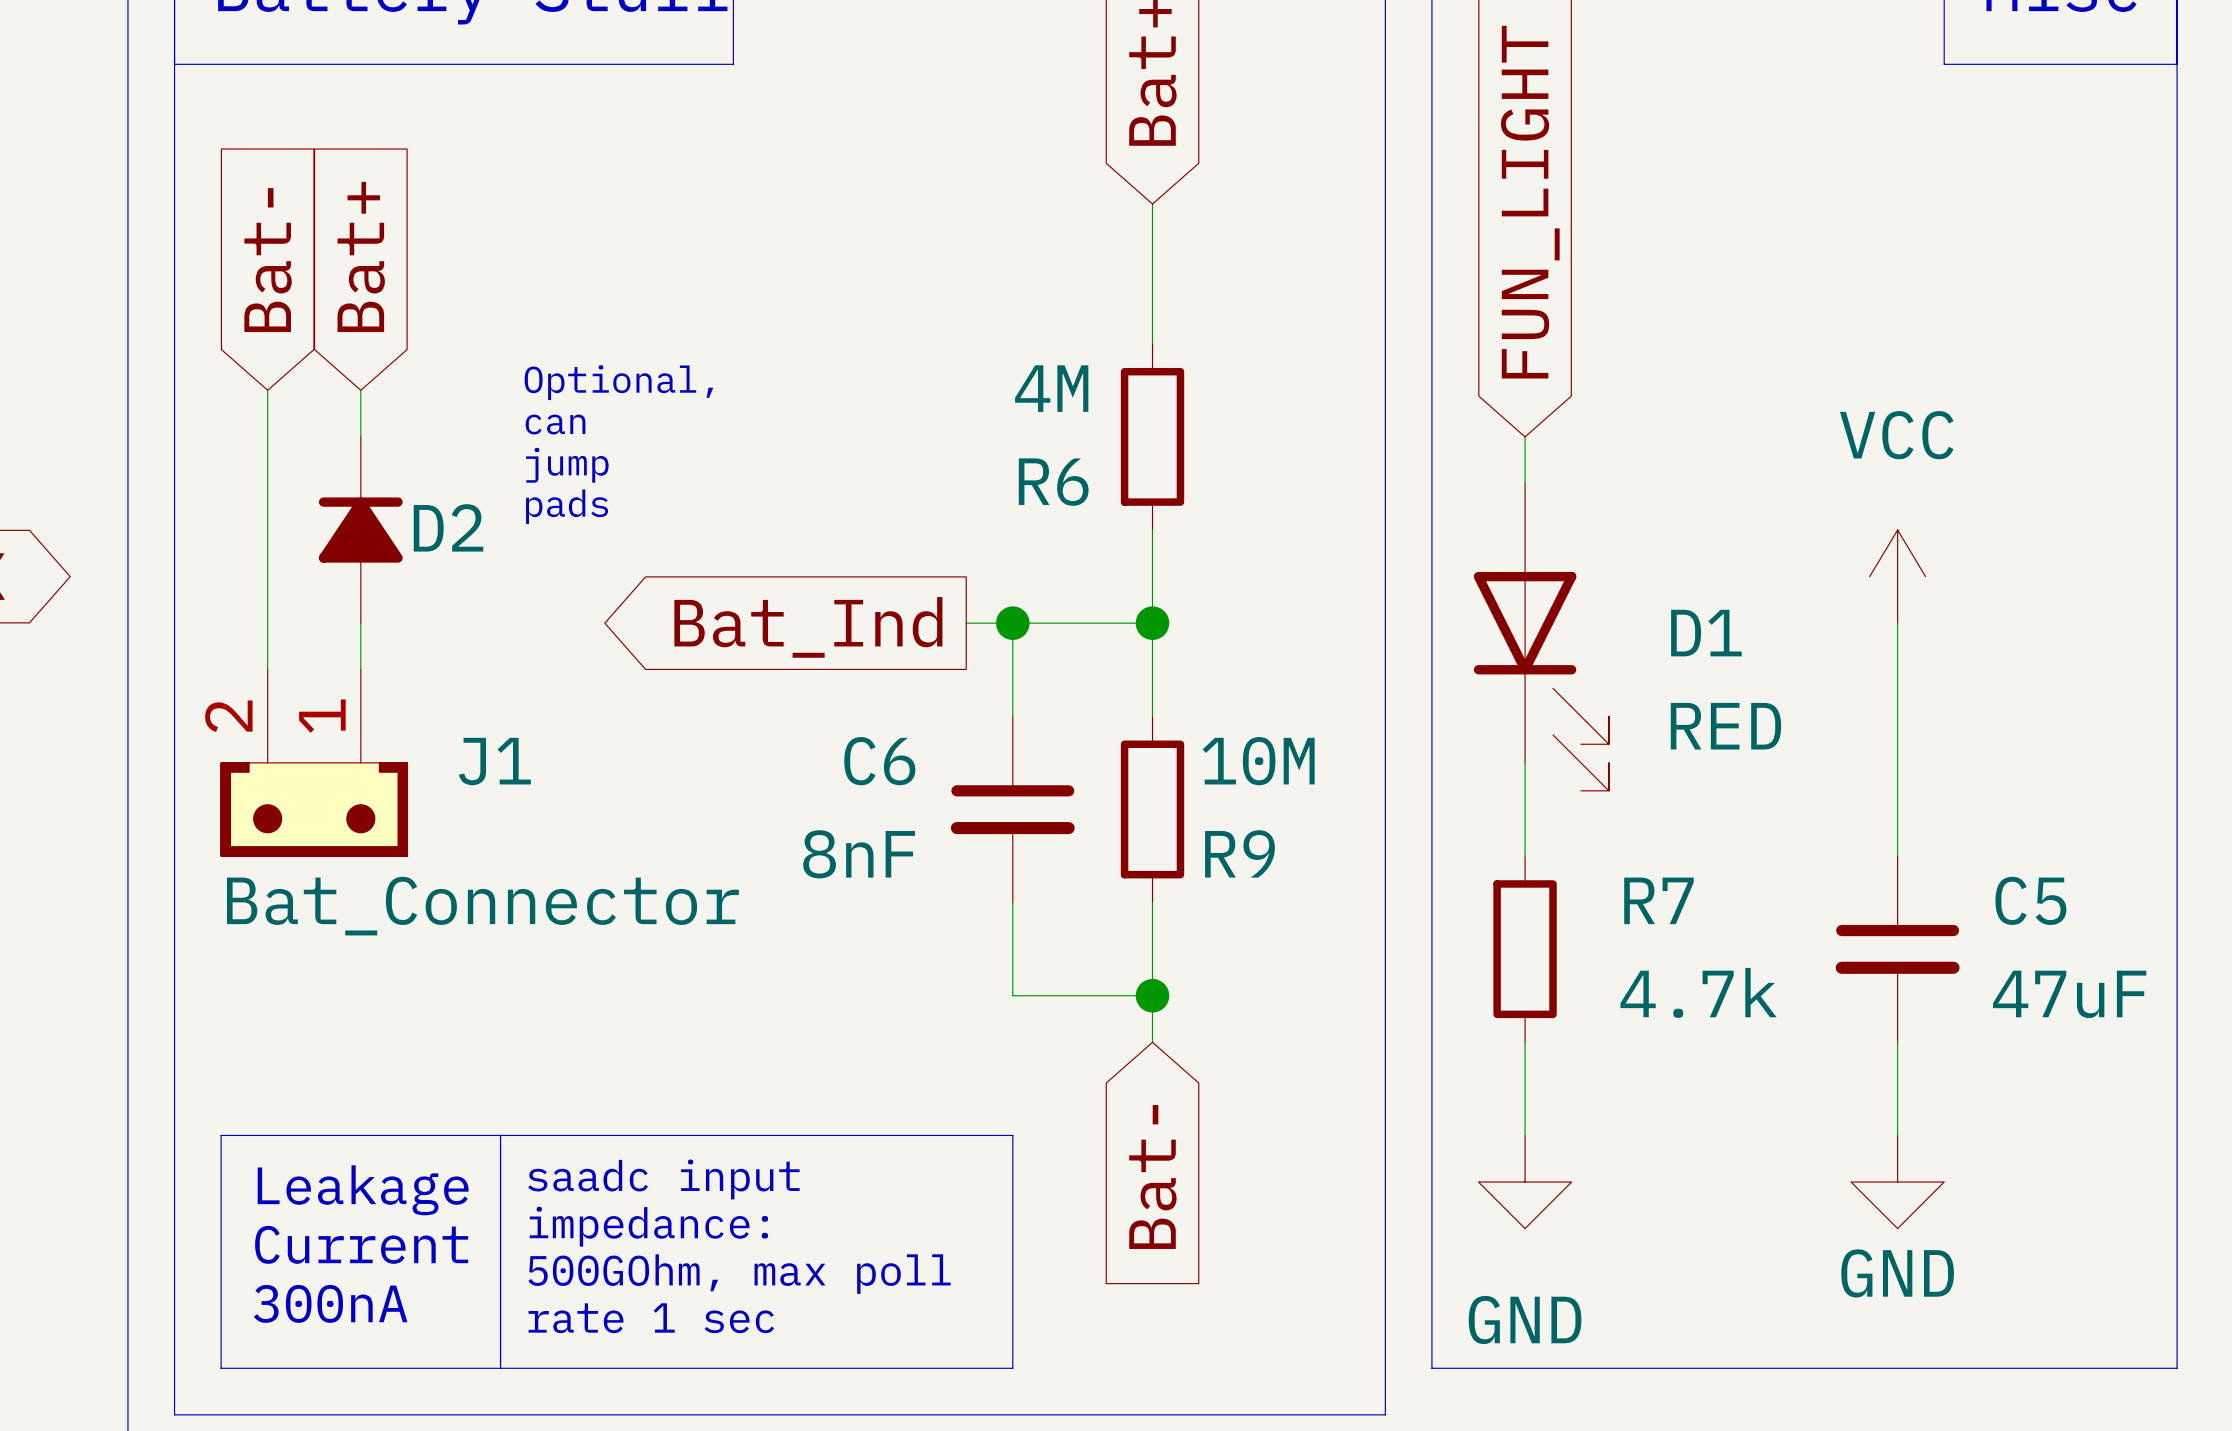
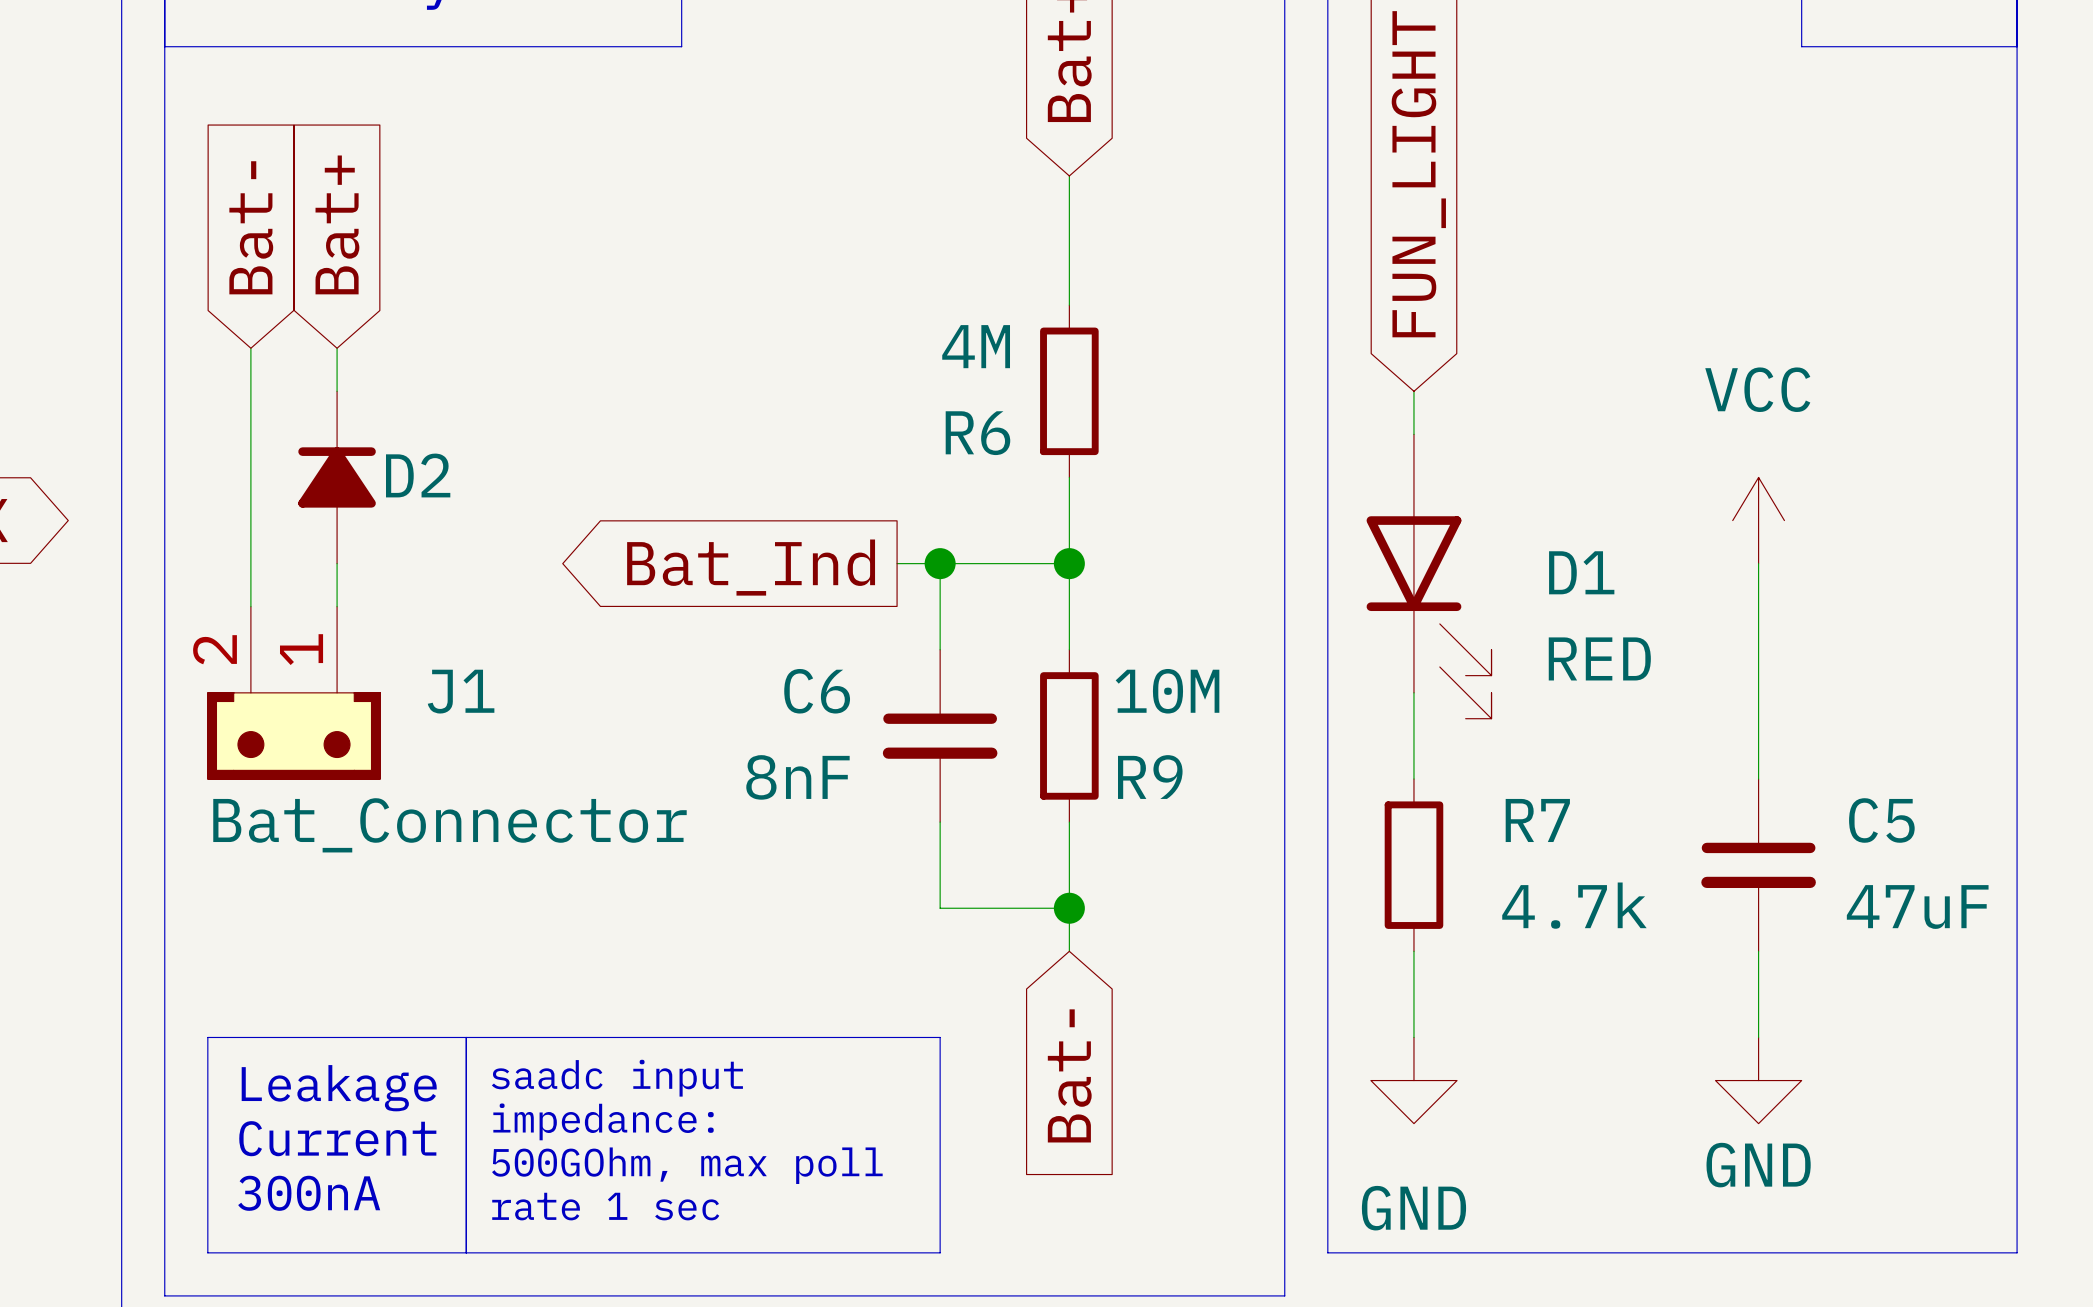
text: Optional, (618, 382) -> none
text: can (555, 424) -> none
text: jump (567, 465) -> none
text: pads (567, 506) -> none

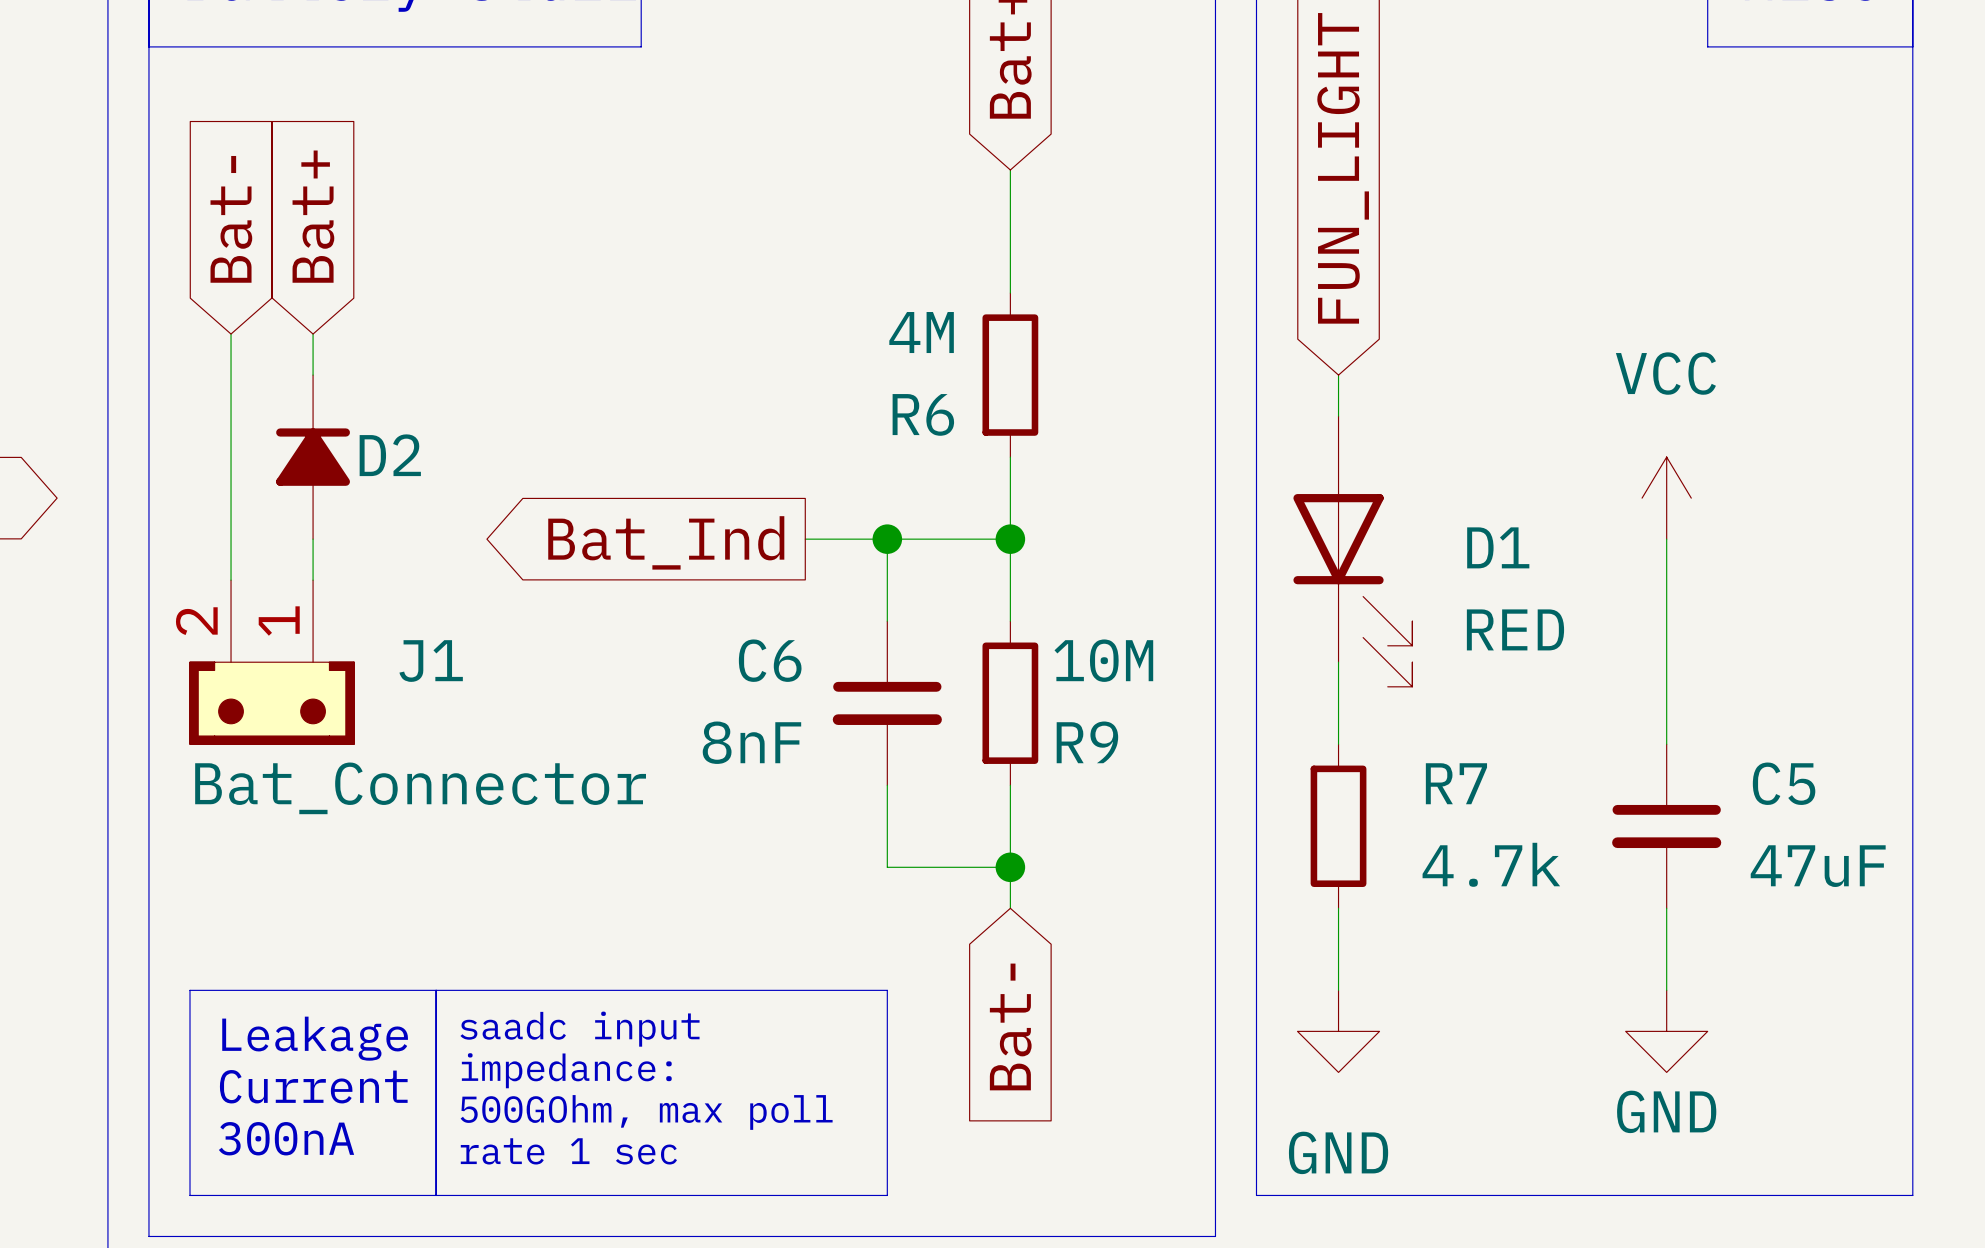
wire: none -> (805, 539) (846, 539)
global label position: Bat_Ind (751, 567) -> Bat_Ind (666, 542)

